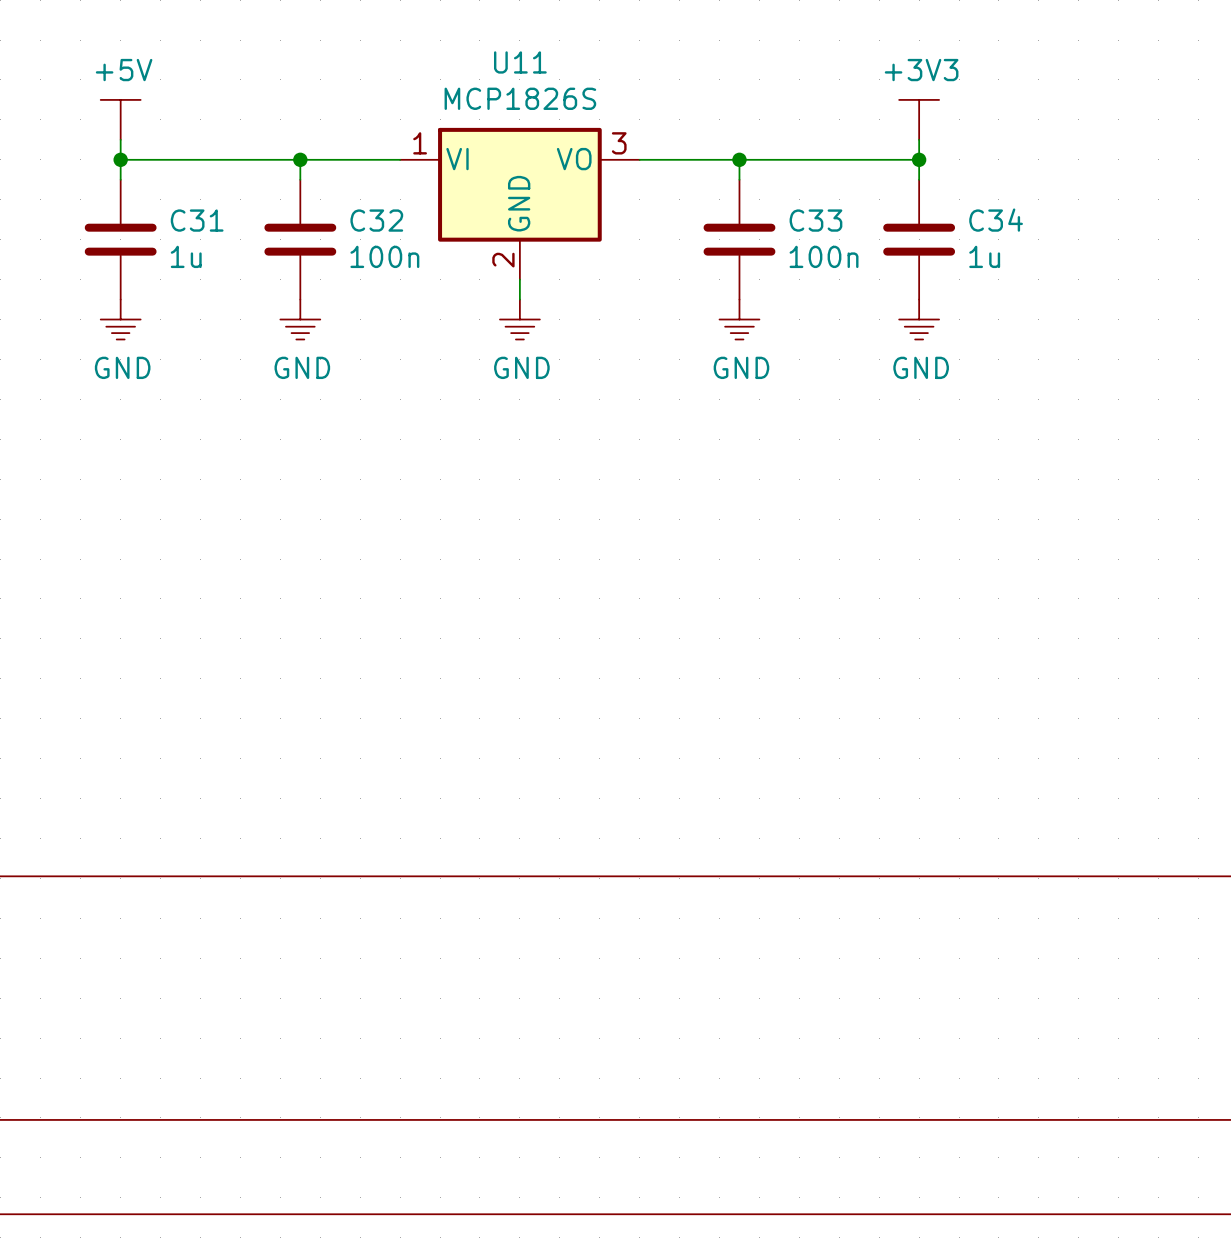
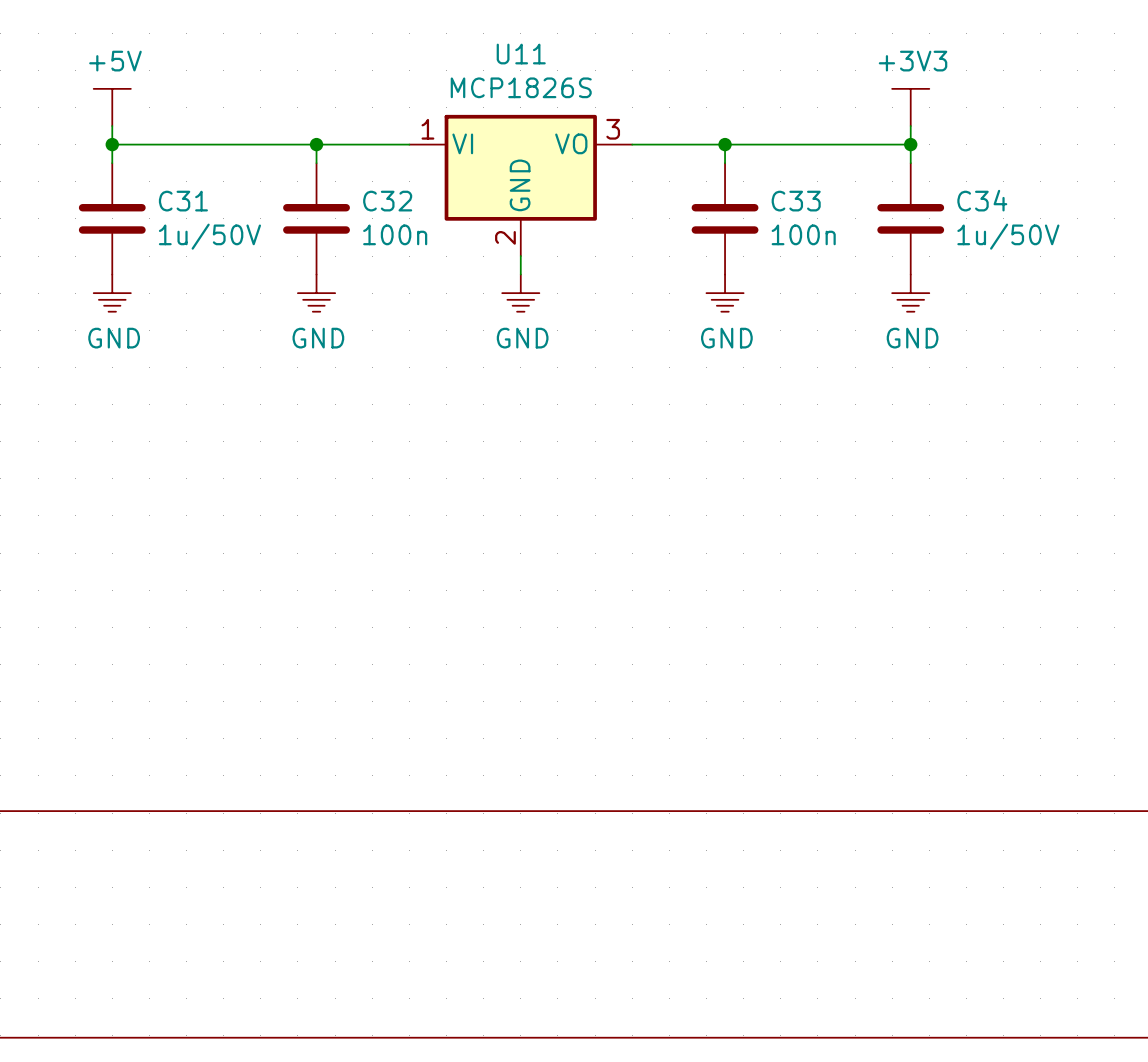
power symbol position: +3V3 (919, 119) -> +3V3 (910, 107)
wire: (919, 139) (919, 179) -> (910, 126) (910, 163)
wire: (300, 159) (300, 179) -> (316, 144) (316, 163)
junction position: (300, 159) -> (316, 144)
wire: (739, 159) (739, 179) -> (725, 144) (725, 163)
junction position: (739, 159) -> (725, 144)
wire: none -> (855, 144) (910, 144)
junction position: (919, 159) -> (910, 144)
U11 position: (519, 203) -> (520, 185)
C32 position: (300, 239) -> (316, 218)
C33 position: (739, 239) -> (725, 218)
C34 position: (919, 239) -> (910, 218)
C31 value: 1u (186, 256) -> 1u/50V (209, 236)
C34 value: 1u (984, 256) -> 1u/50V (1008, 236)
wire: (519, 279) (519, 299) -> (520, 256) (520, 274)
power symbol position: GND (300, 319) -> GND (316, 293)
power symbol position: GND (519, 319) -> GND (520, 293)
power symbol position: GND (739, 319) -> GND (725, 293)
power symbol position: GND (919, 319) -> GND (910, 293)

